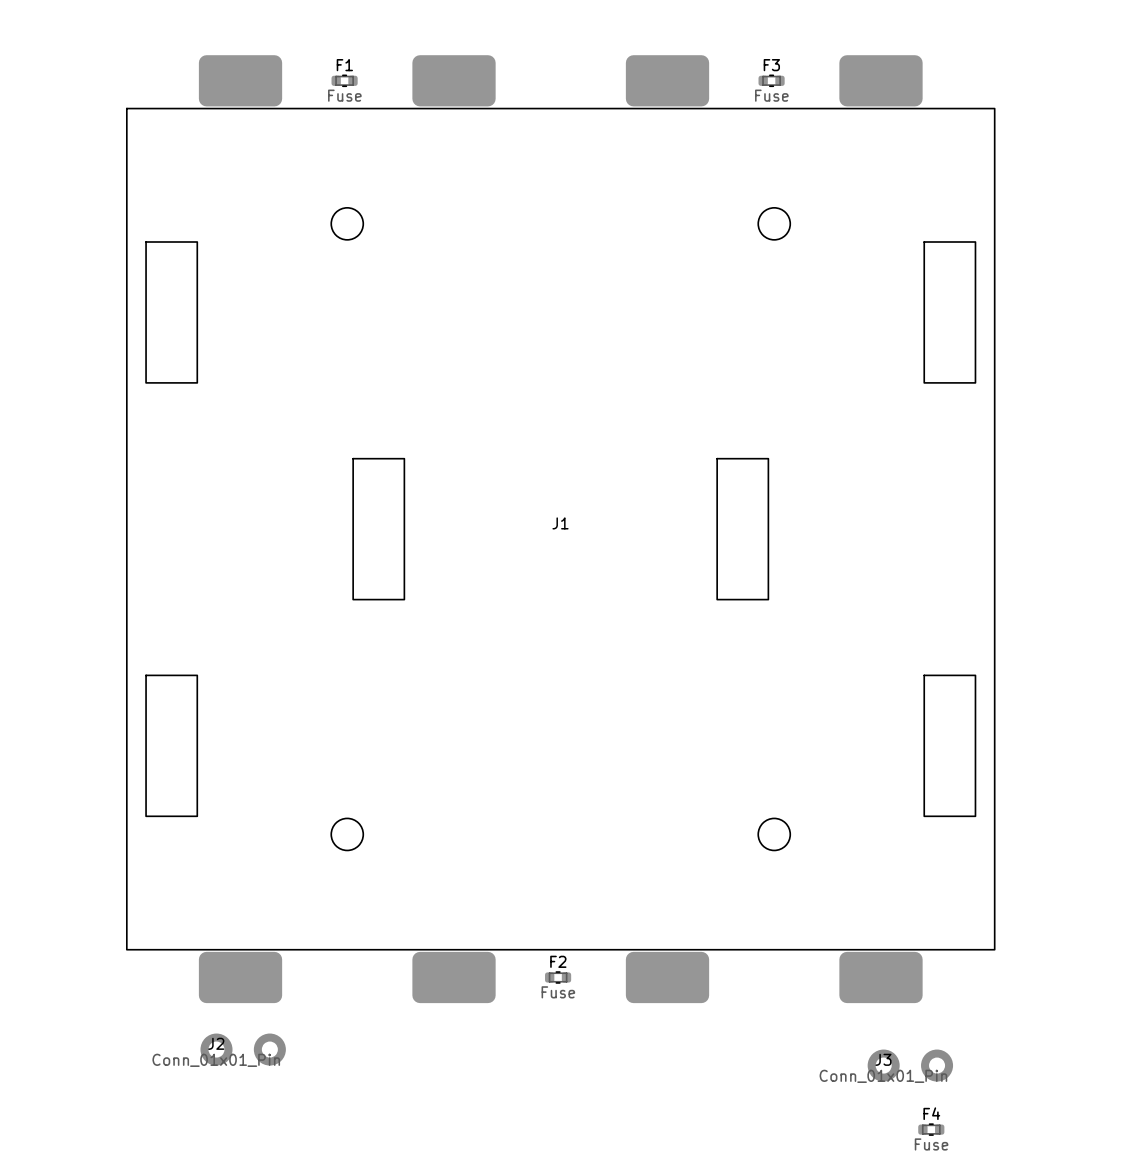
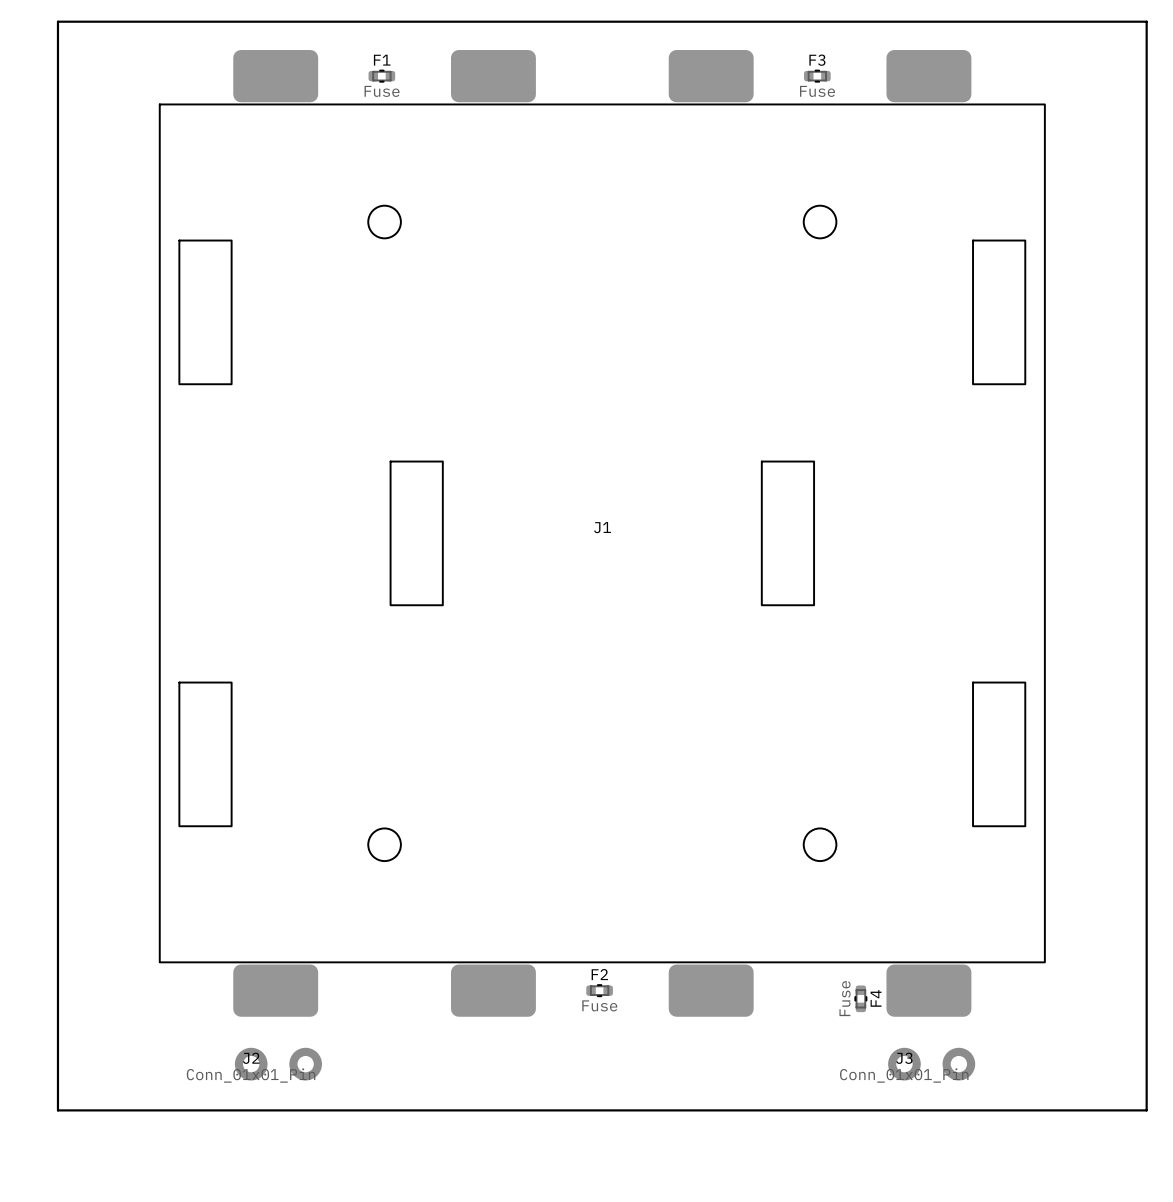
board edge: none -> (57, 21) (1146, 21) (1146, 1110) (57, 1110) (57, 21)
J3 position: (910, 1065) -> (931, 1064)
F4 rotation: 0° (931, 1129) -> 90° clockwise (860, 998)
F4 position: (931, 1129) -> (860, 998)

